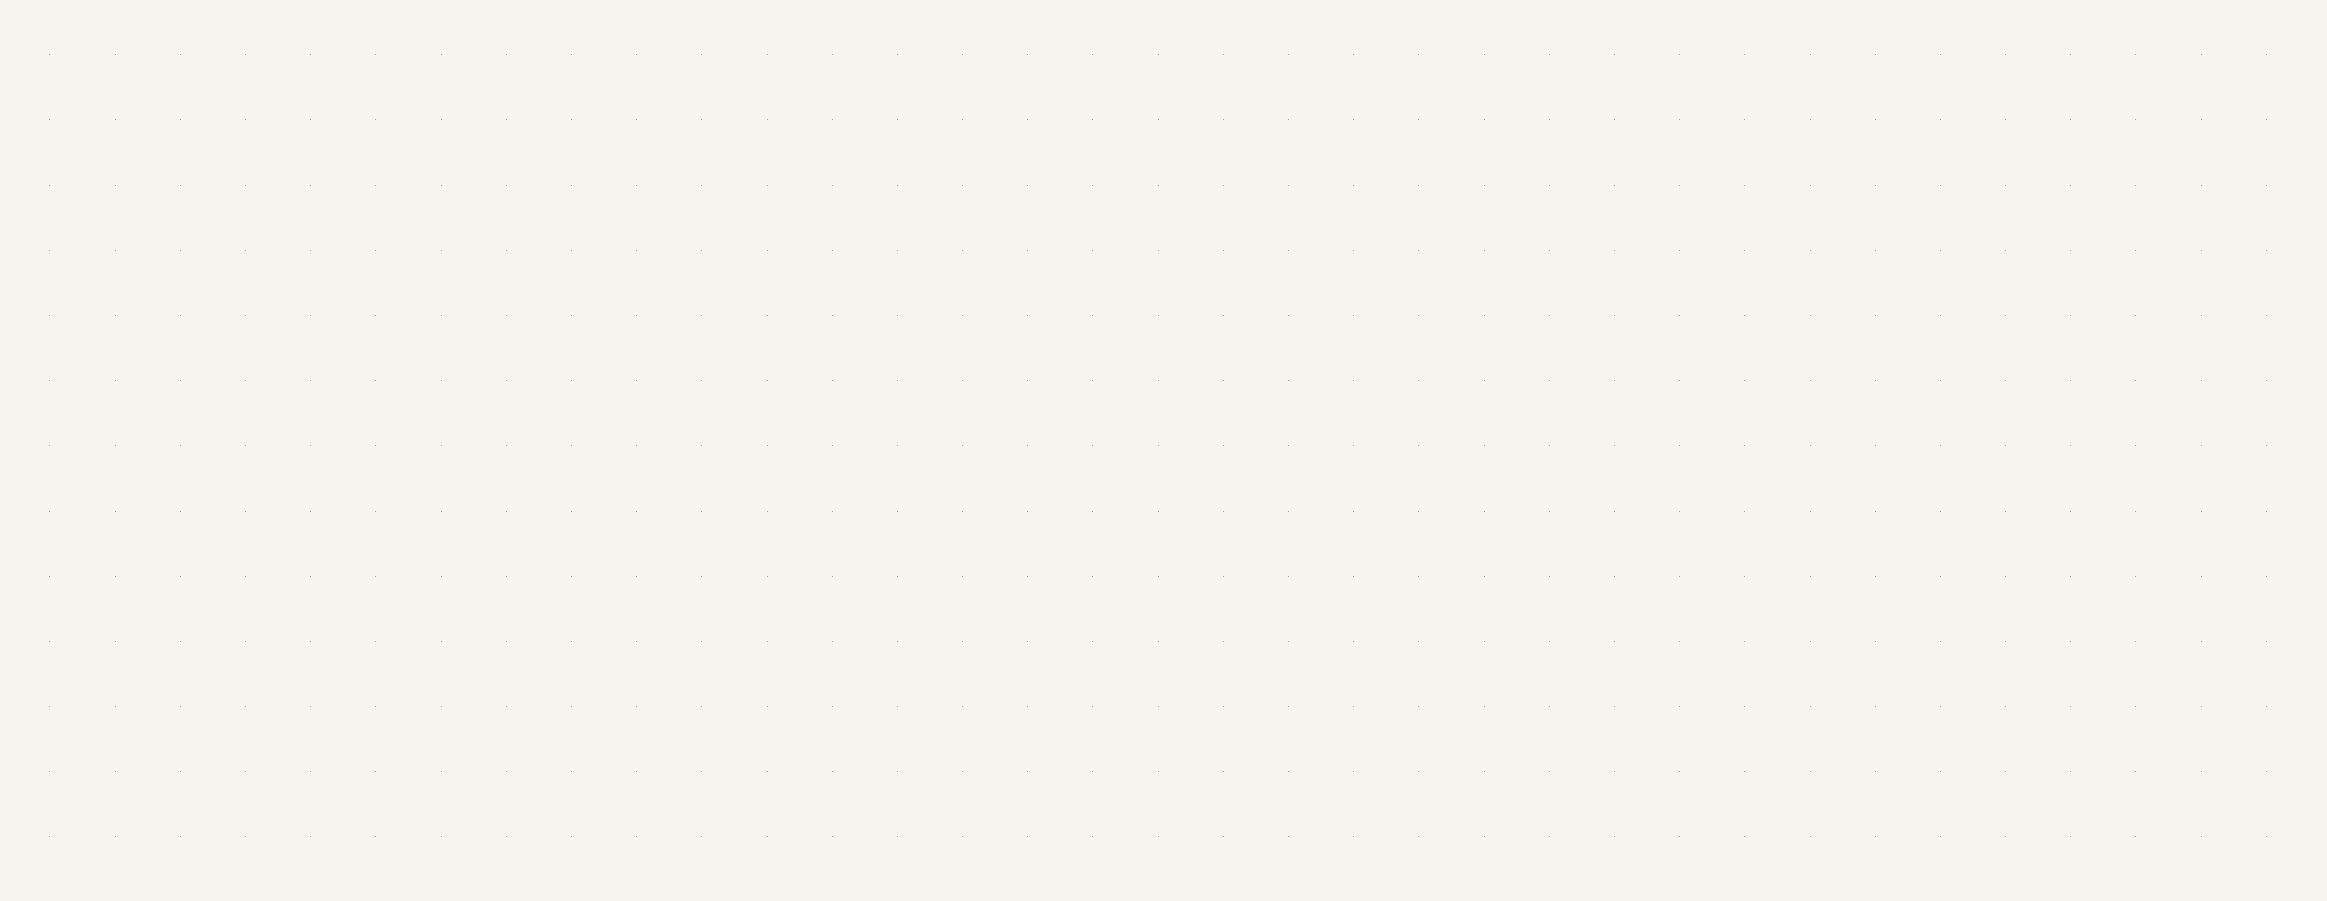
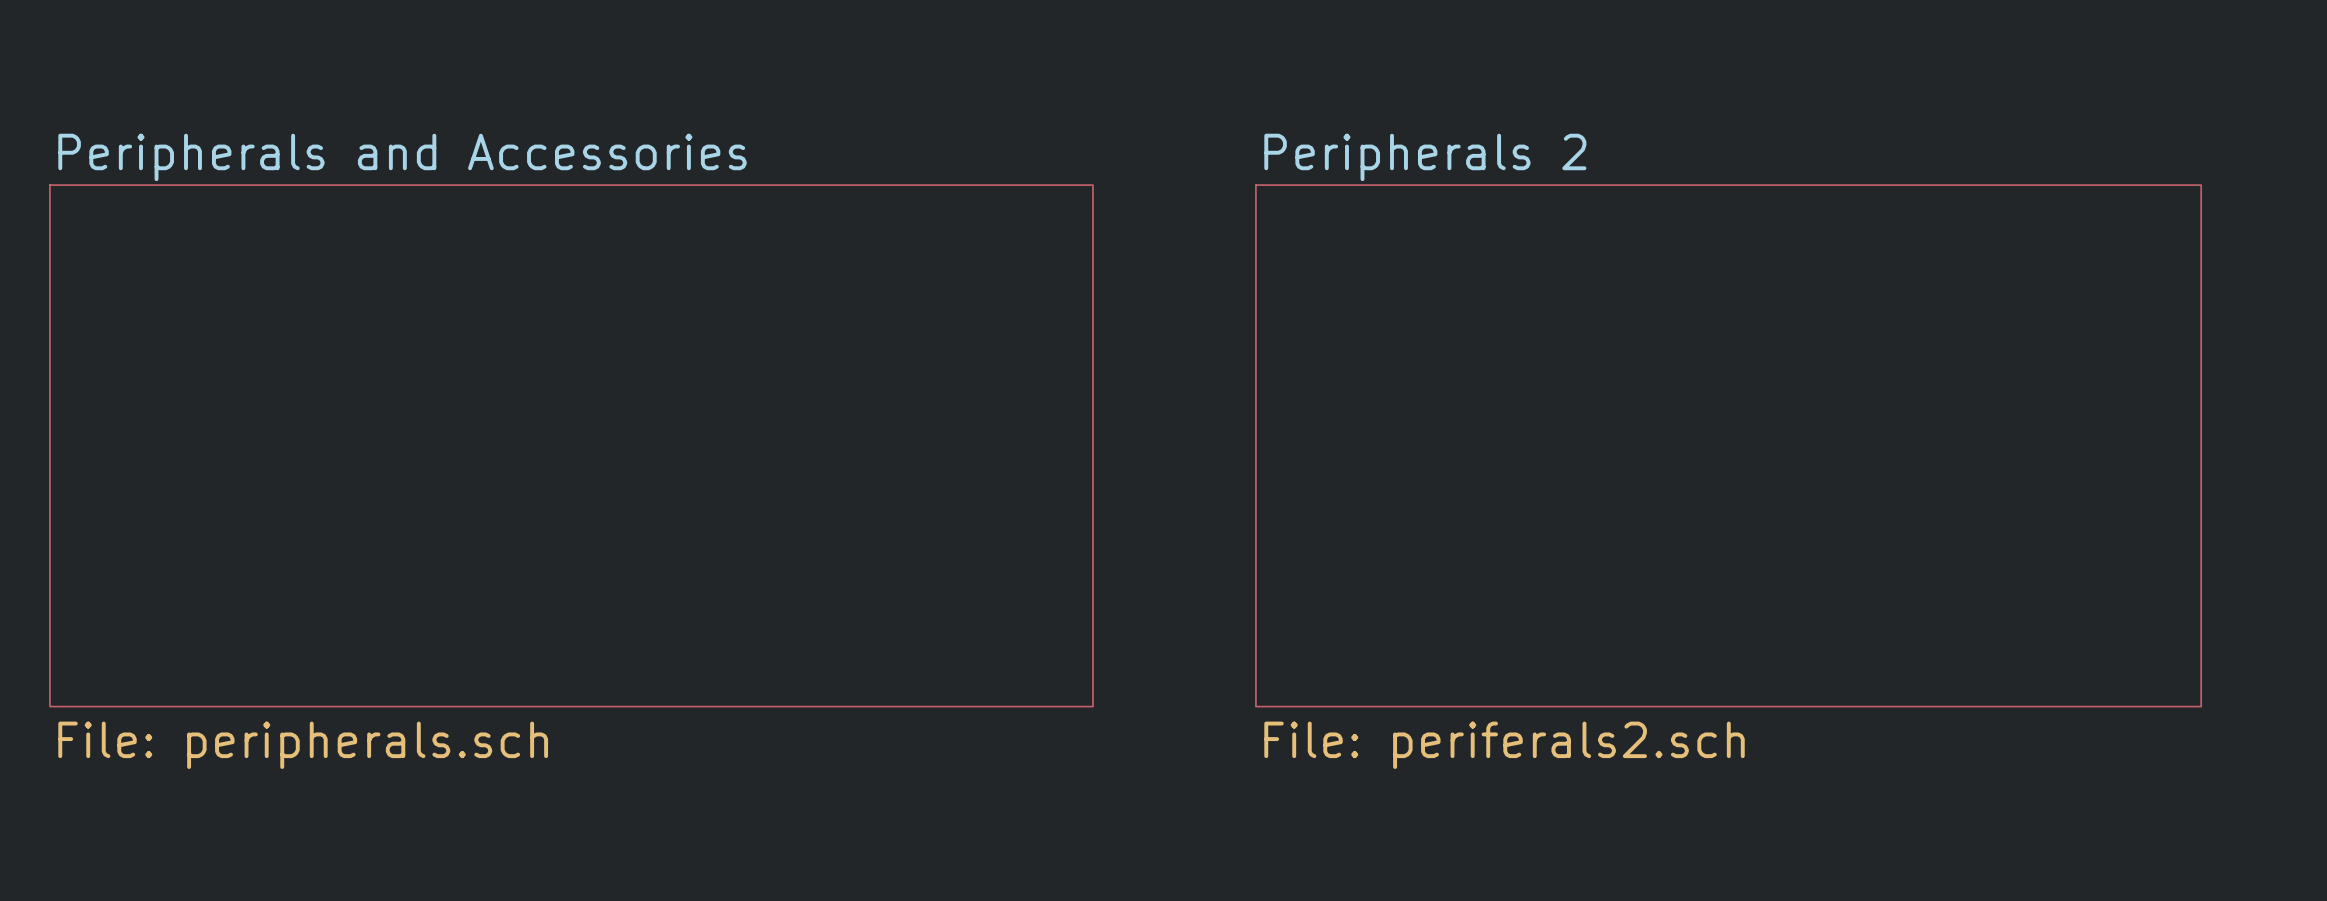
sheet Peripherals and Accessories: none -> File: peripherals.sch (571, 445)
sheet Peripherals 2: none -> File: periferals2.sch (1728, 445)

